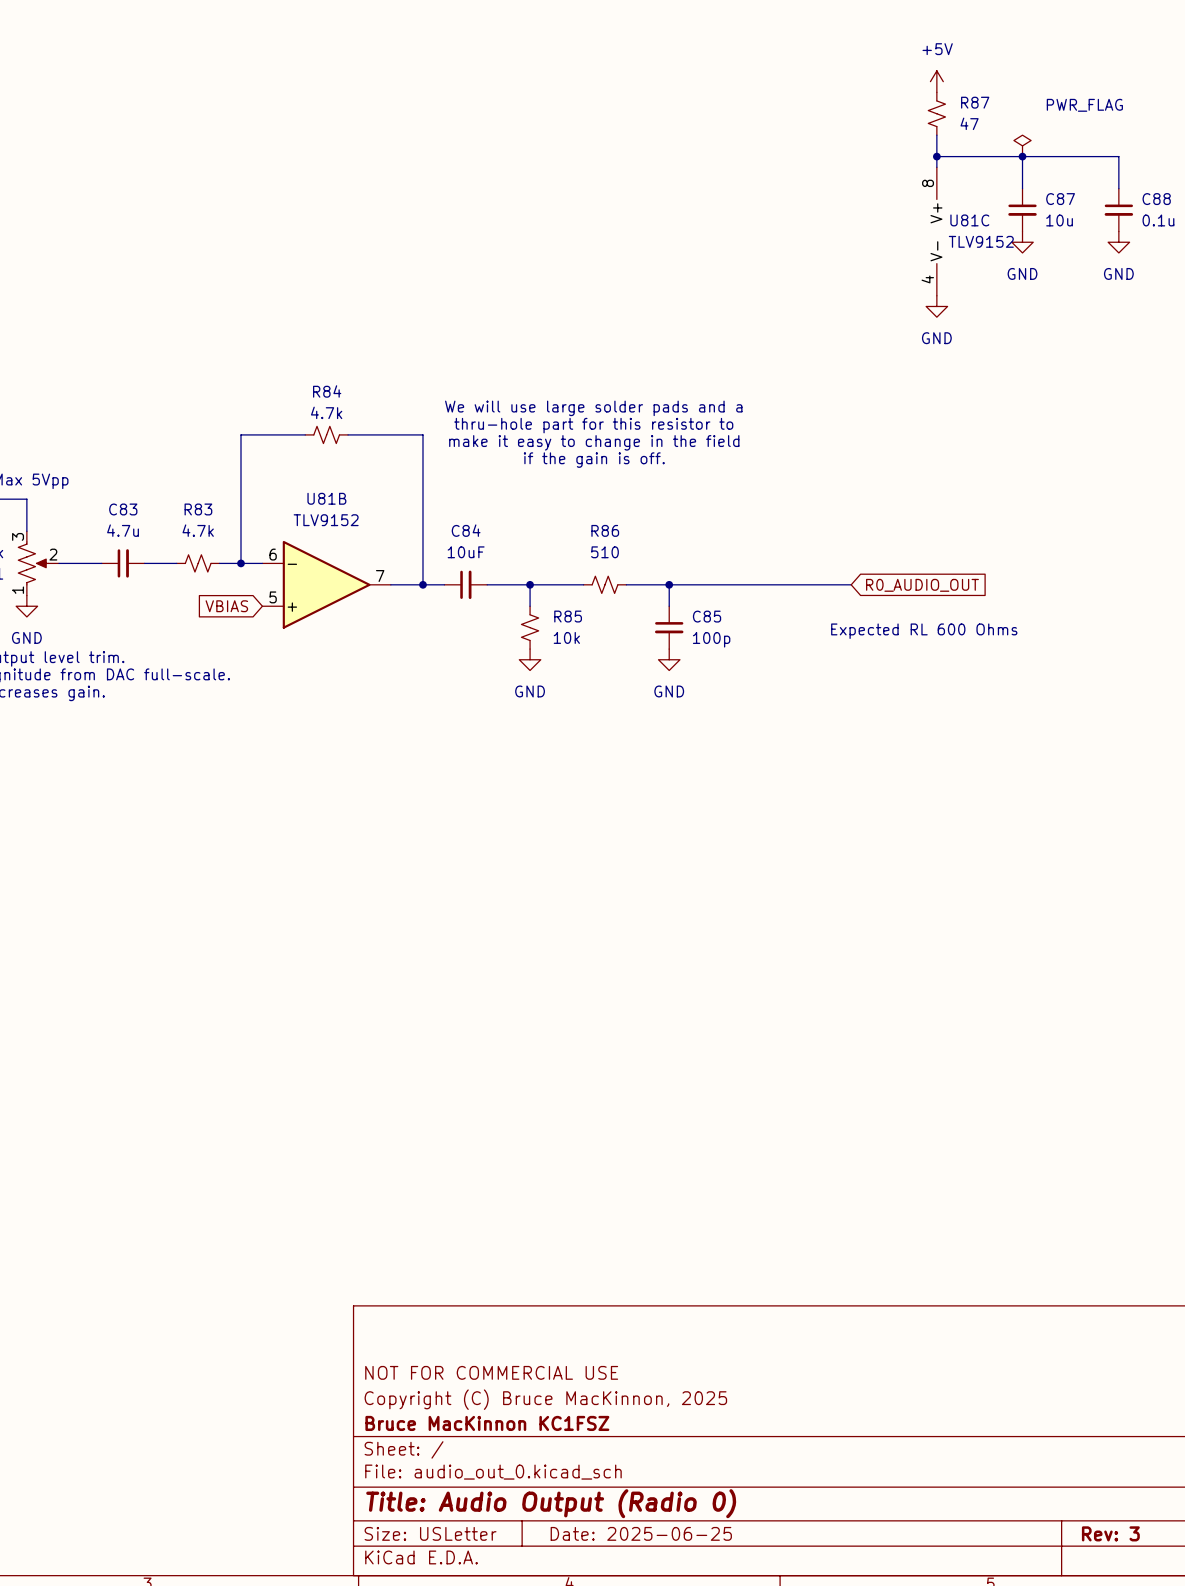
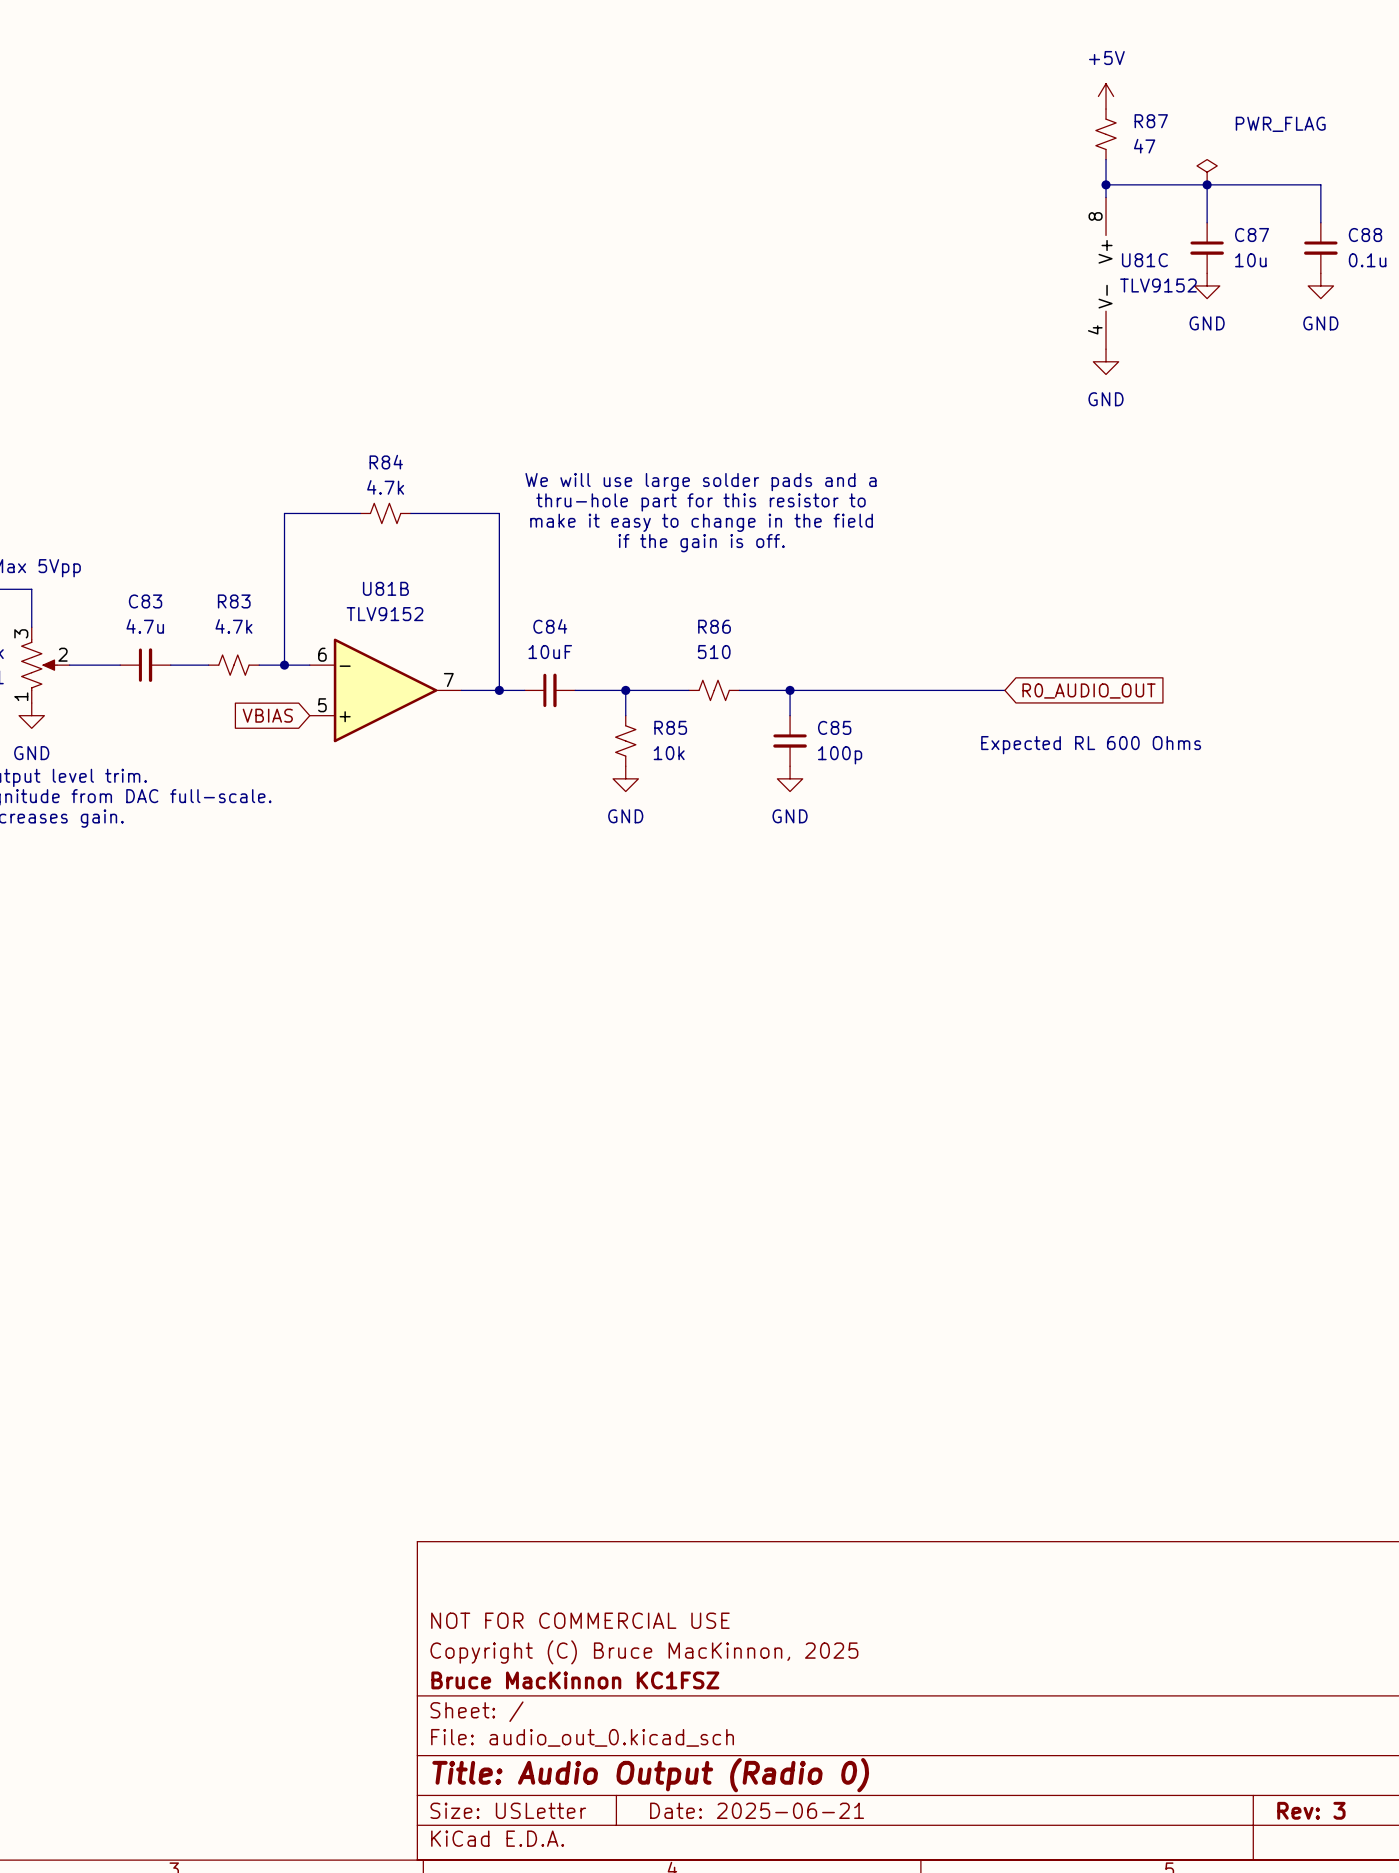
title block: Date: 2025-06-25 (641, 1533) -> Date: 2025-06-21 (757, 1810)

